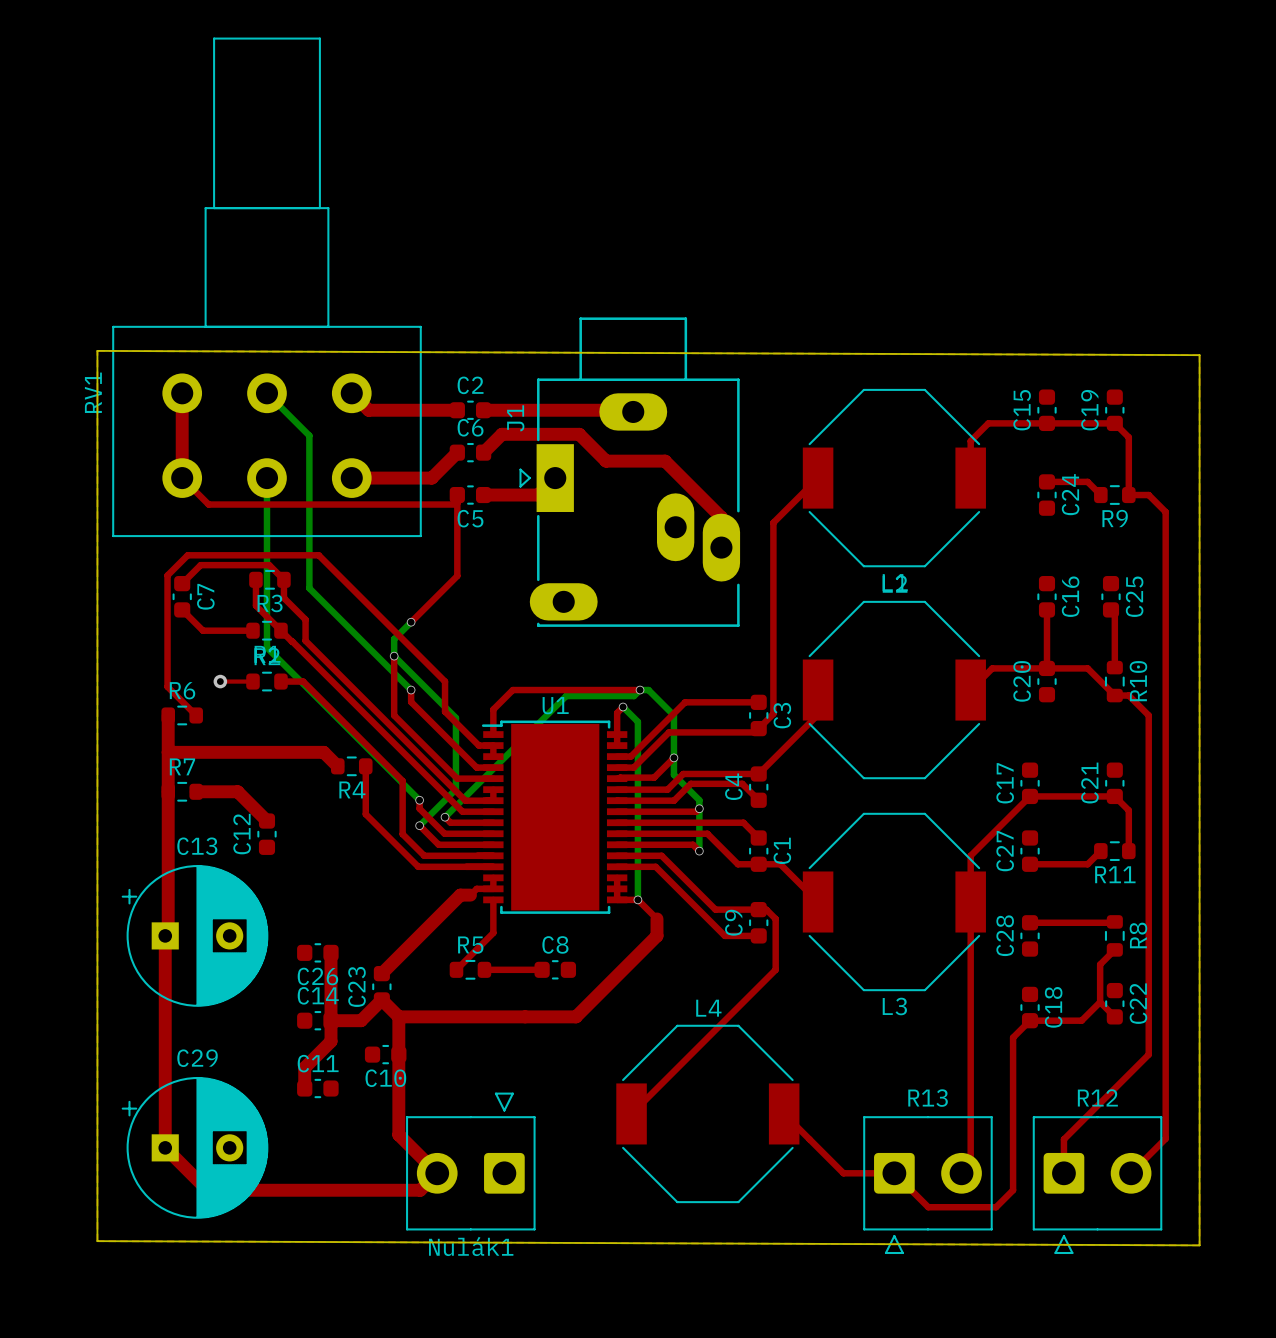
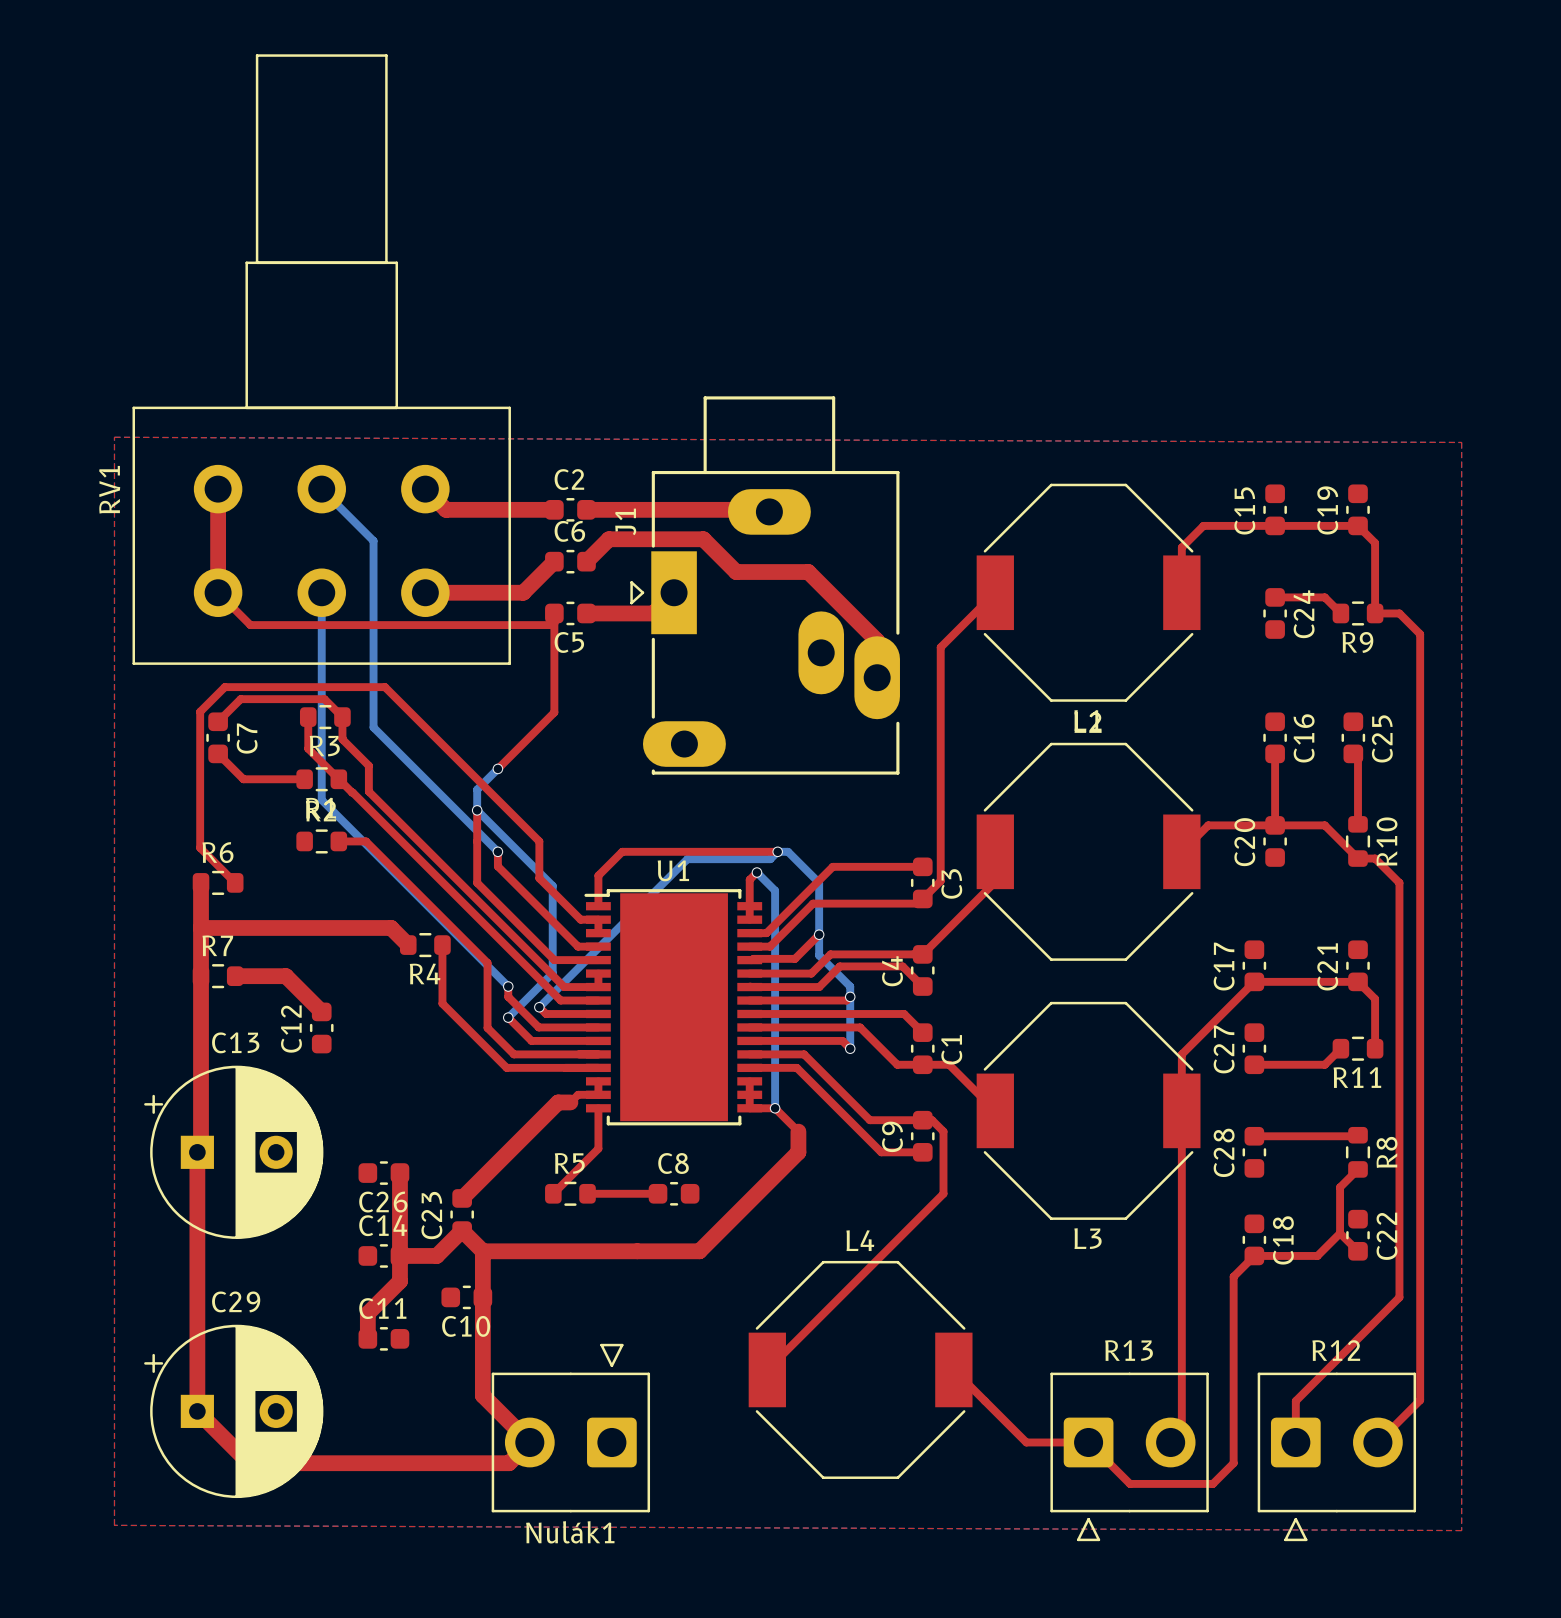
board edge: (97, 350) (1199, 355) (1199, 1245) (97, 1241) (97, 350) -> none
top track: (220, 681) (253, 681) -> none
via: (220, 681) -> none

